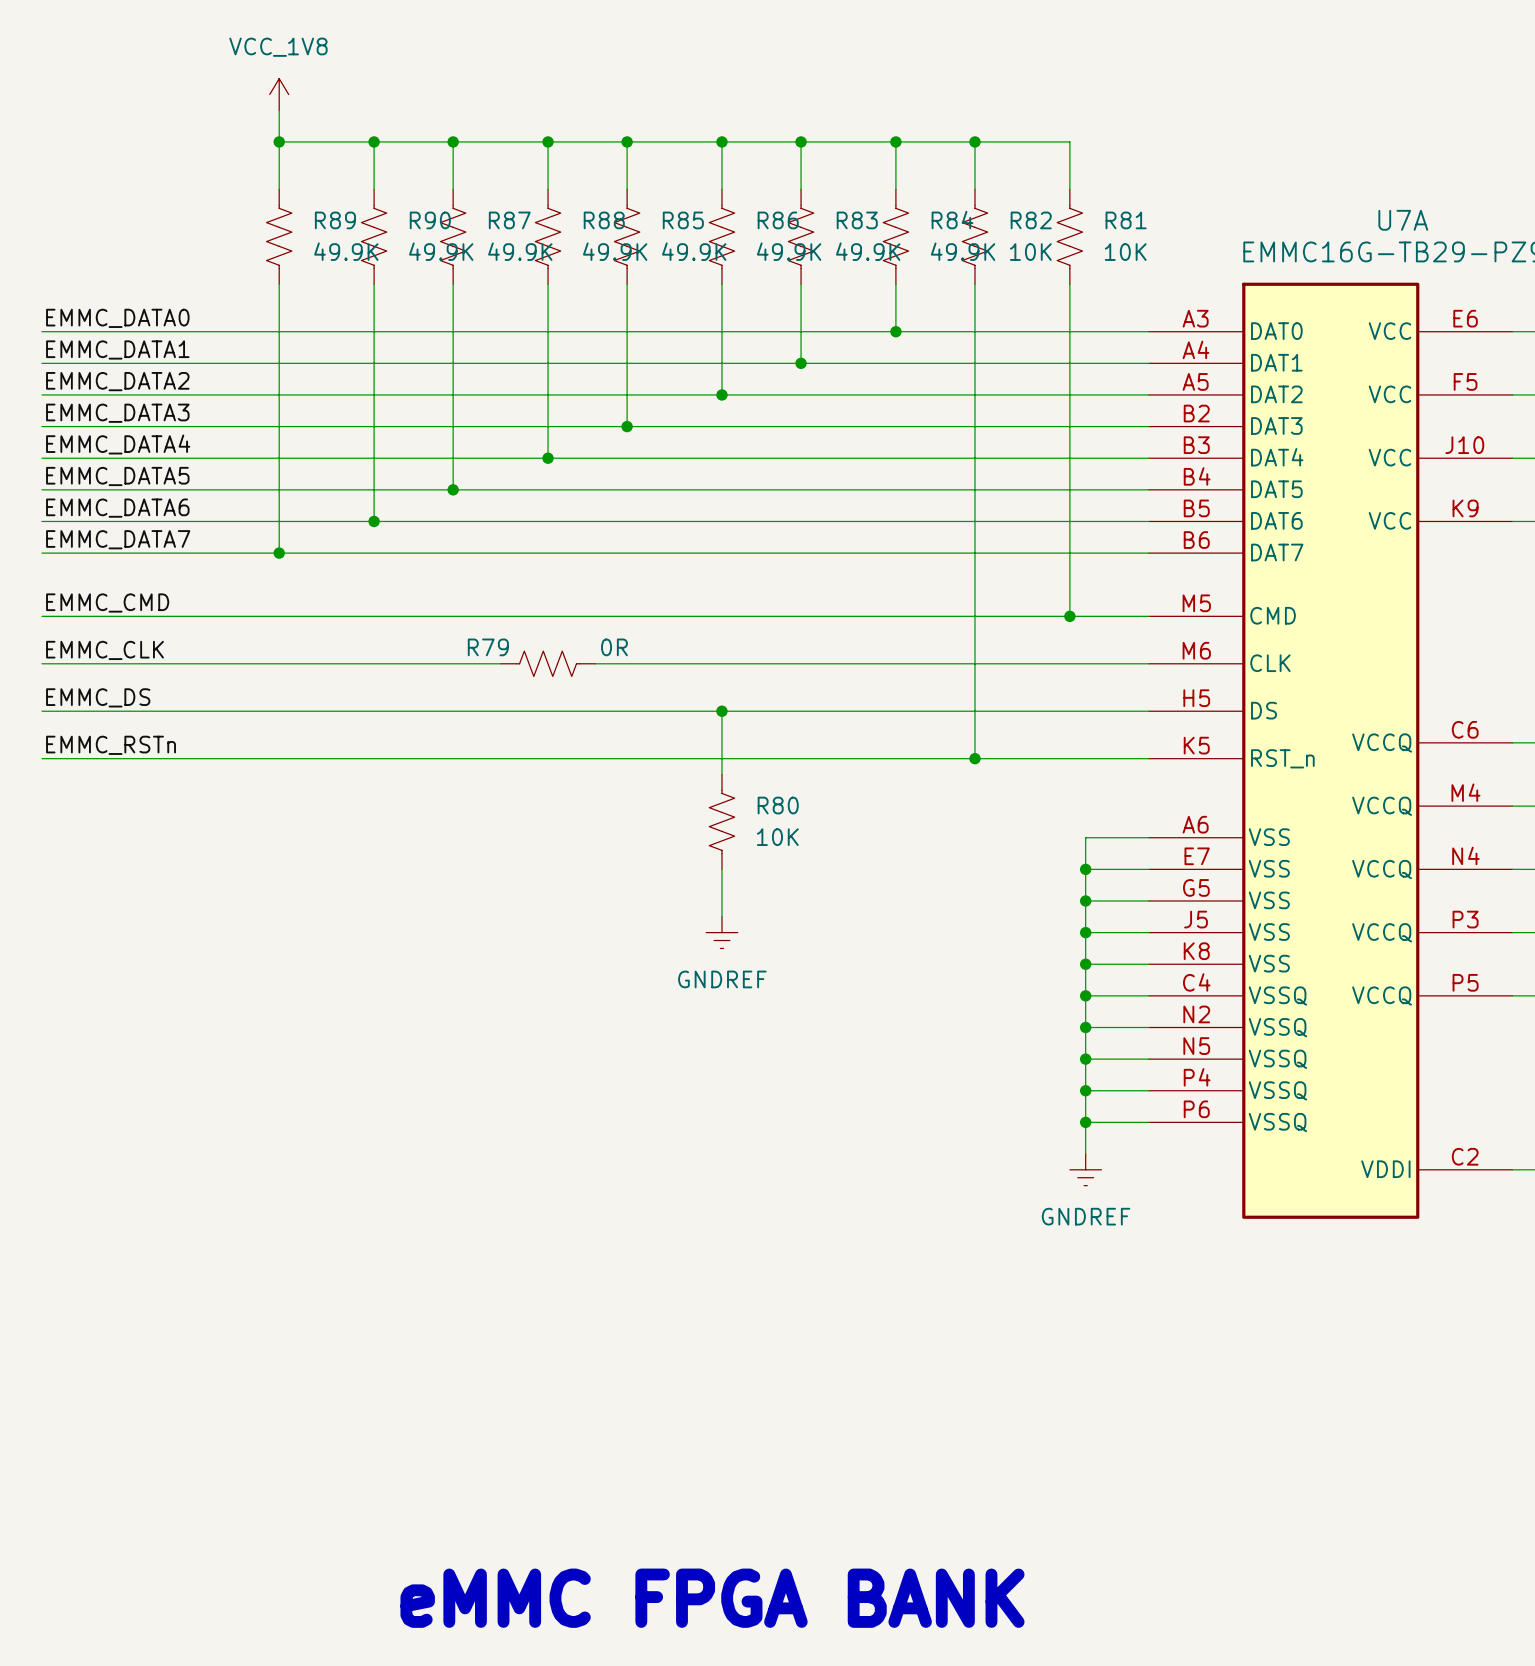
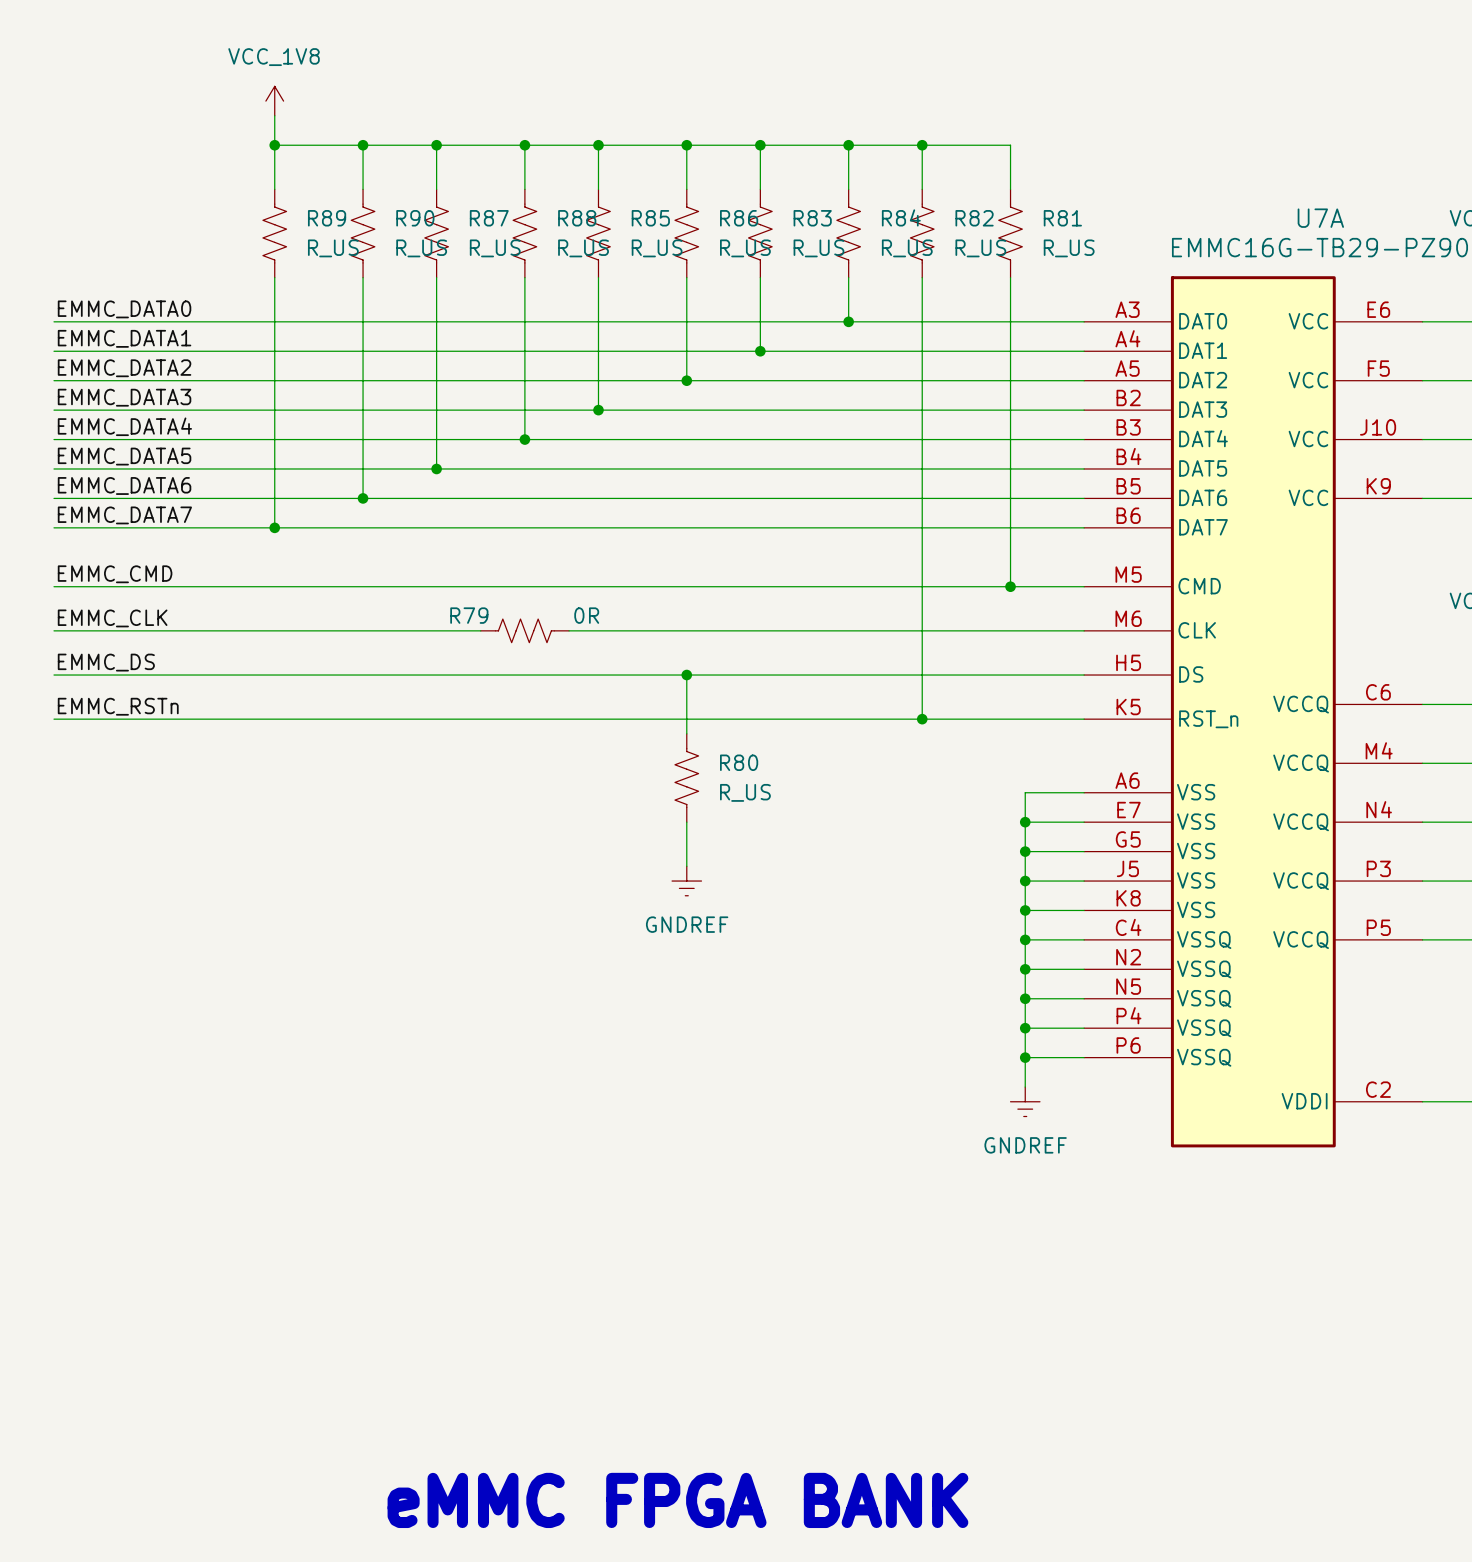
R89 value: 49.9K (346, 251) -> R_US (333, 248)
R90 value: 49.9K (441, 251) -> R_US (421, 248)
R87 value: 49.9K (520, 251) -> R_US (495, 248)
R88 value: 49.9K (615, 251) -> R_US (583, 248)
R85 value: 49.9K (694, 251) -> R_US (657, 248)
R86 value: 49.9K (789, 251) -> R_US (745, 248)
R83 value: 49.9K (868, 251) -> R_US (818, 248)
R84 value: 49.9K (963, 251) -> R_US (907, 248)
R82 value: 10K (1030, 252) -> R_US (980, 248)
R81 value: 10K (1125, 252) -> R_US (1069, 248)
R80 value: 10K (777, 837) -> R_US (745, 792)

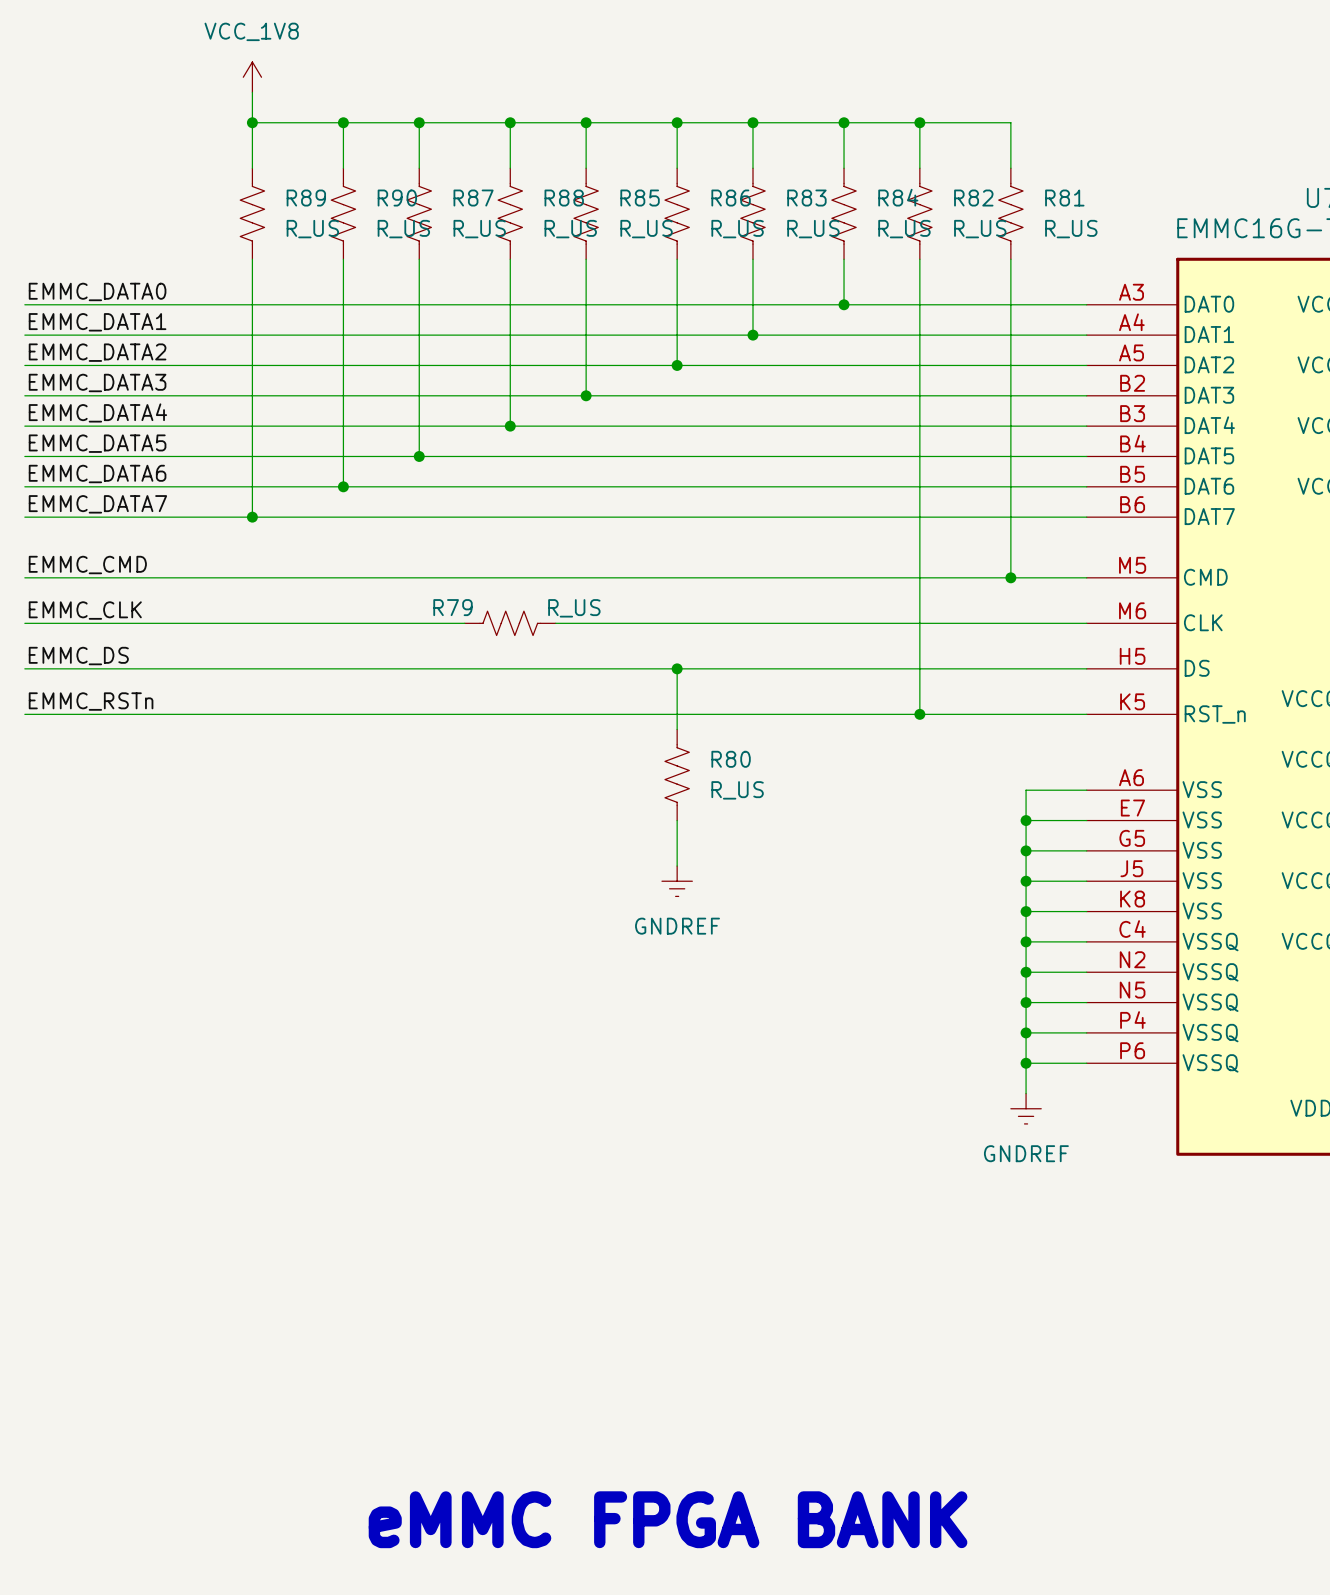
R79 value: 0R (586, 615) -> R_US (574, 608)

